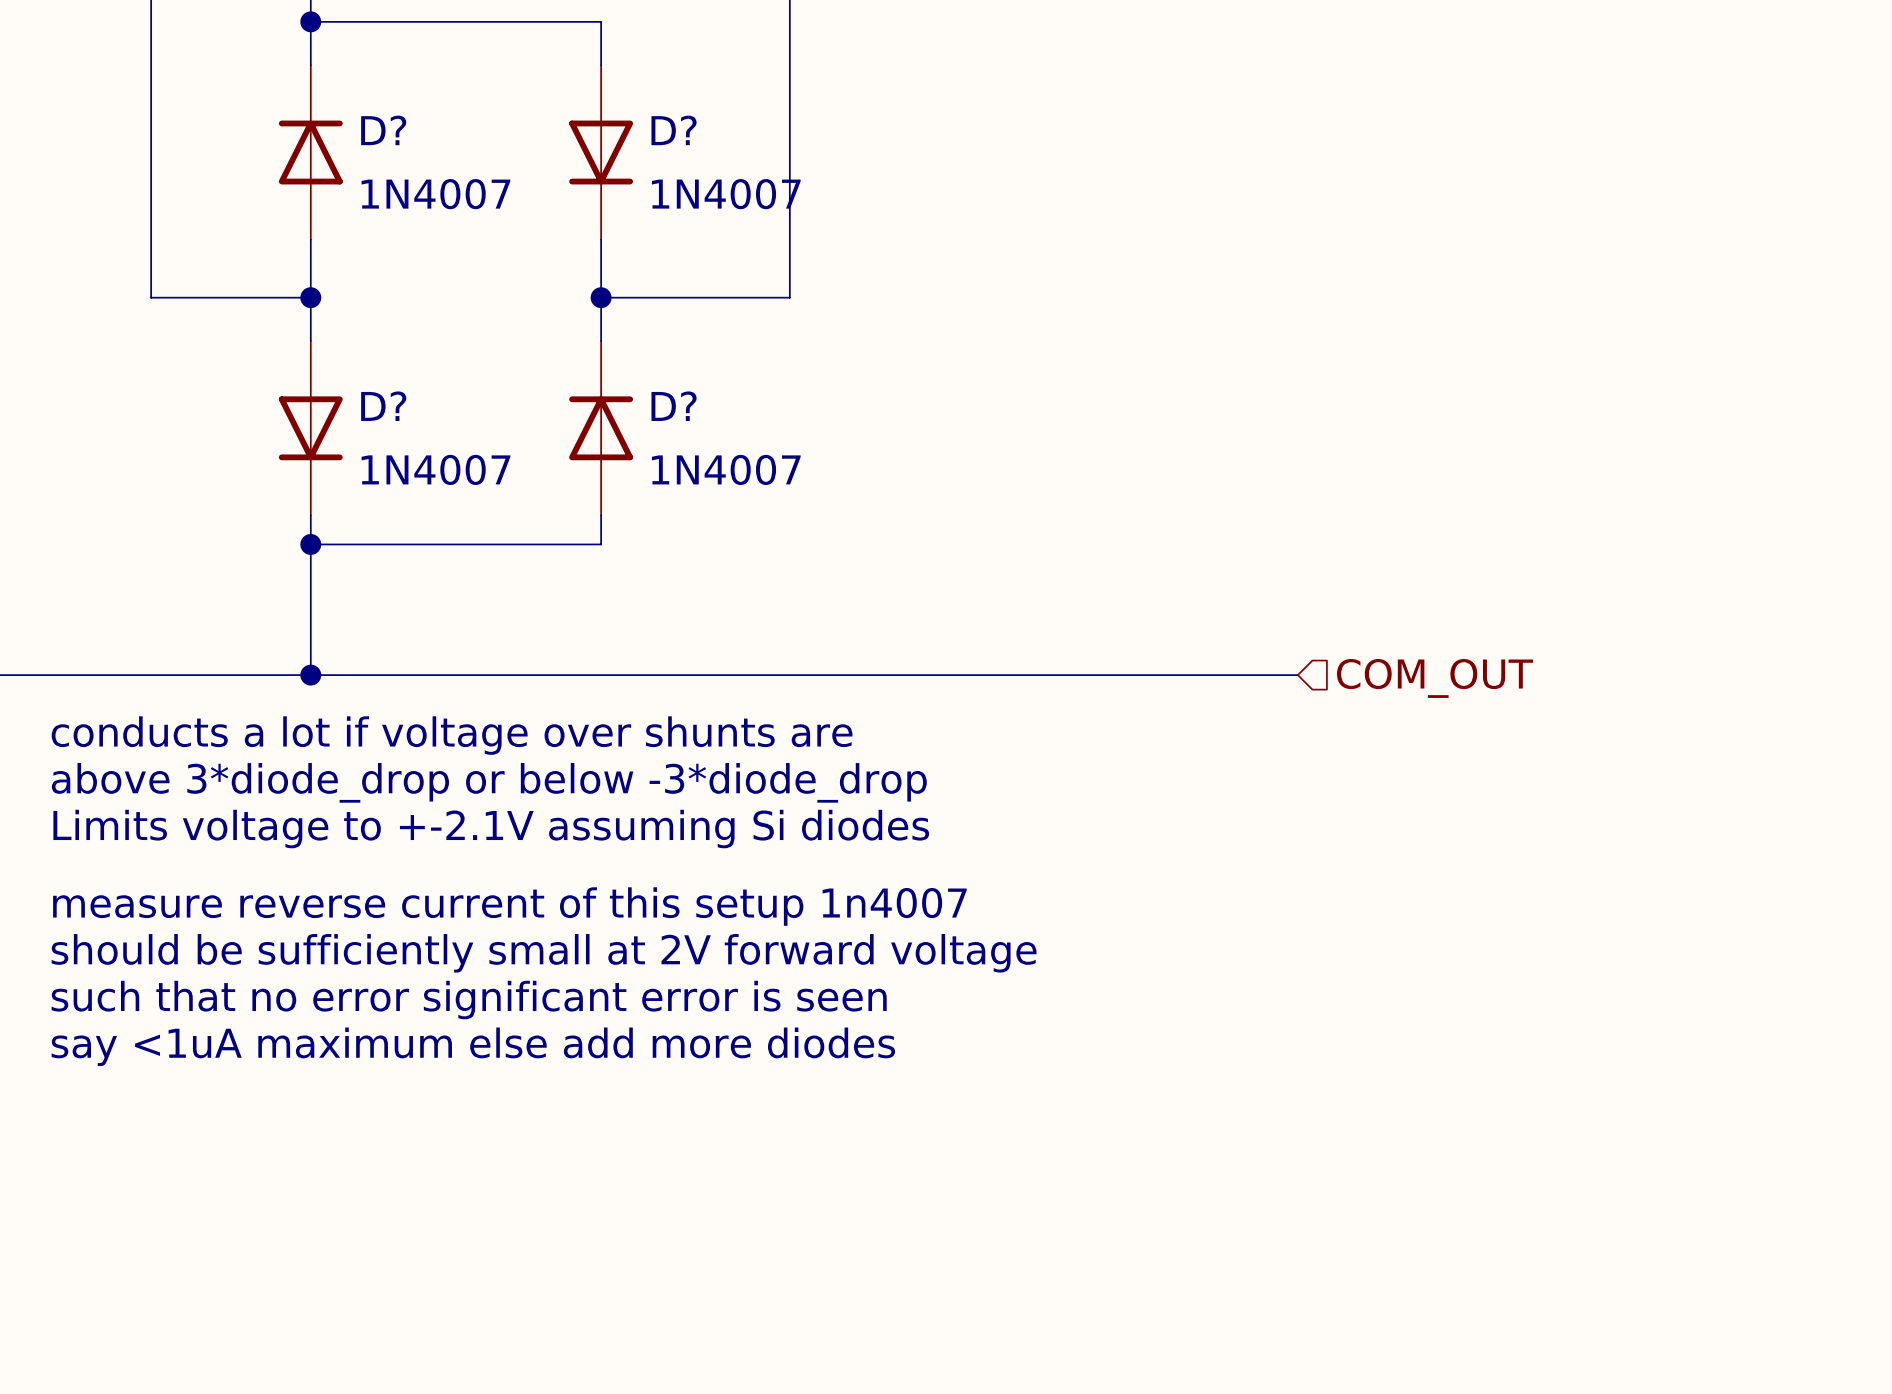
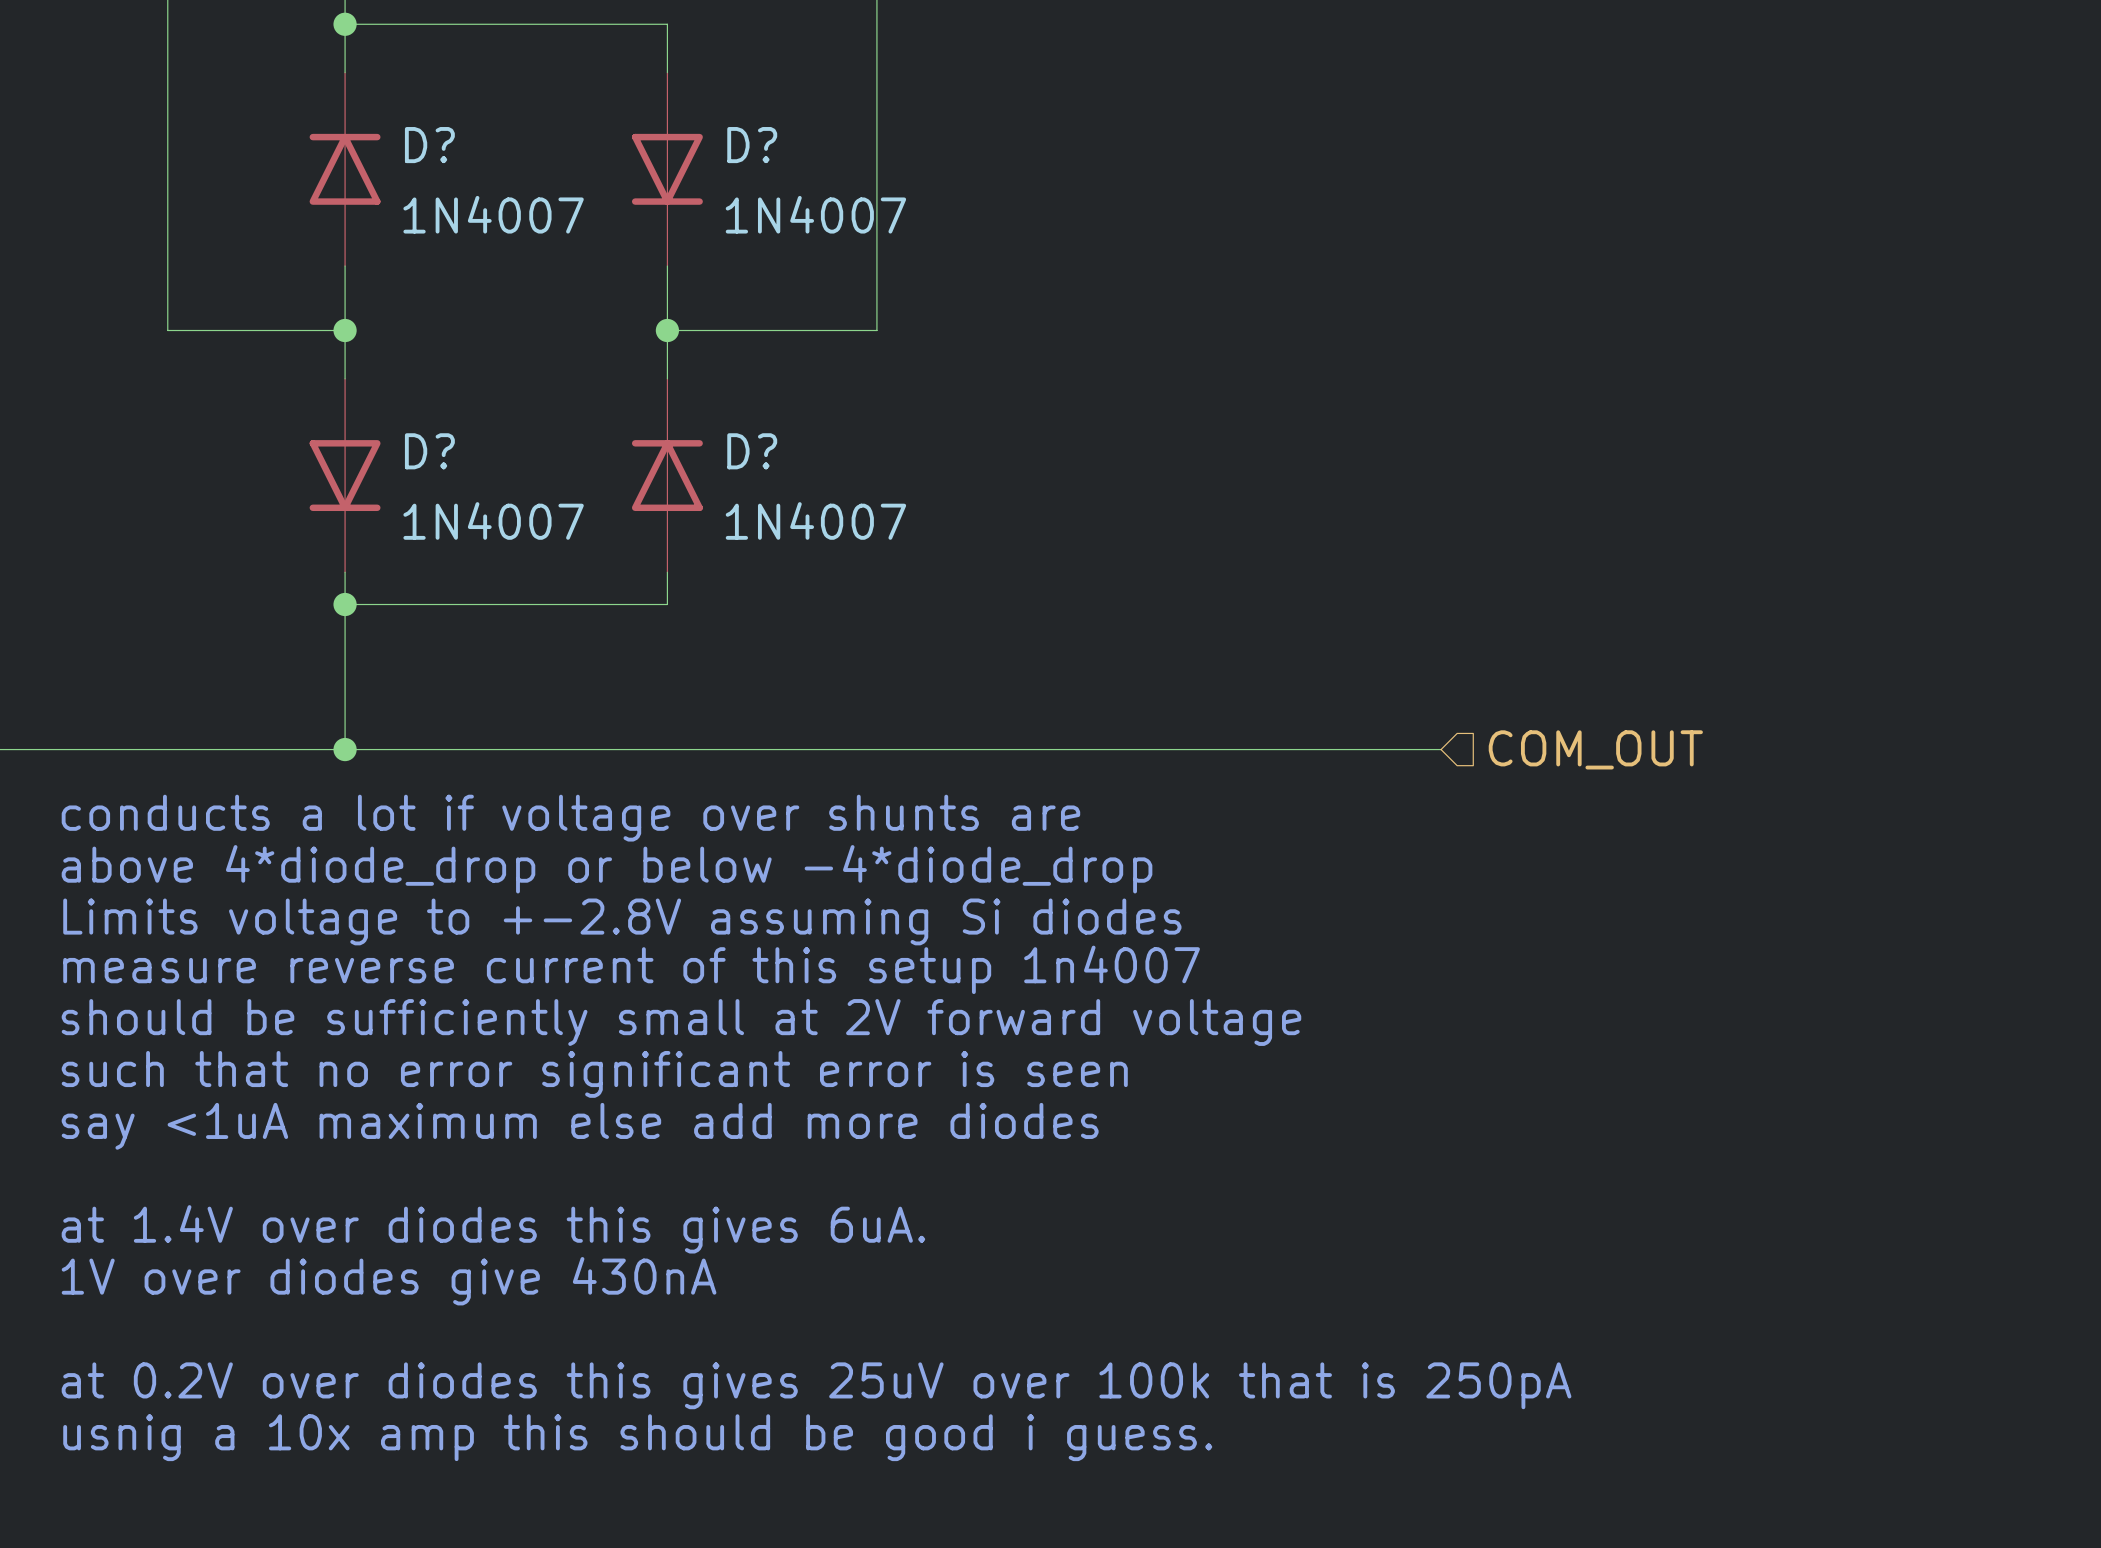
text: above 3*diode_drop or below -3*diode_drop (489, 782) -> above 4*diode_drop or below -4*diode_drop (607, 869)
text: Limits voltage to +-2.1V assuming Si diodes (491, 829) -> Limits voltage to +-2.8V assuming Si diodes (622, 921)
text: none -> measure reverse current of this setup 1n4007 (631, 969)
text: measure reverse current of this setup 1n4007 (509, 906) -> should be sufficiently small at 2V forward voltage (681, 1022)
text: should be sufficiently small at 2V forward voltage (544, 953) -> such that no error significant error is seen (594, 1074)
text: such that no error significant error is seen (469, 1000) -> say <1uA maximum else add more diodes (580, 1126)
text: say <1uA maximum else add more diodes (473, 1046) -> none
text: none -> at 1.4V over diodes this gives 6uA. (493, 1229)
text: none -> 1V over diodes give 430nA (389, 1281)
text: none -> at 0.2V over diodes this gives 25uV over 100k that is 250pA (816, 1385)
text: none -> usnig a 10x amp this should be good i guess. (637, 1437)

